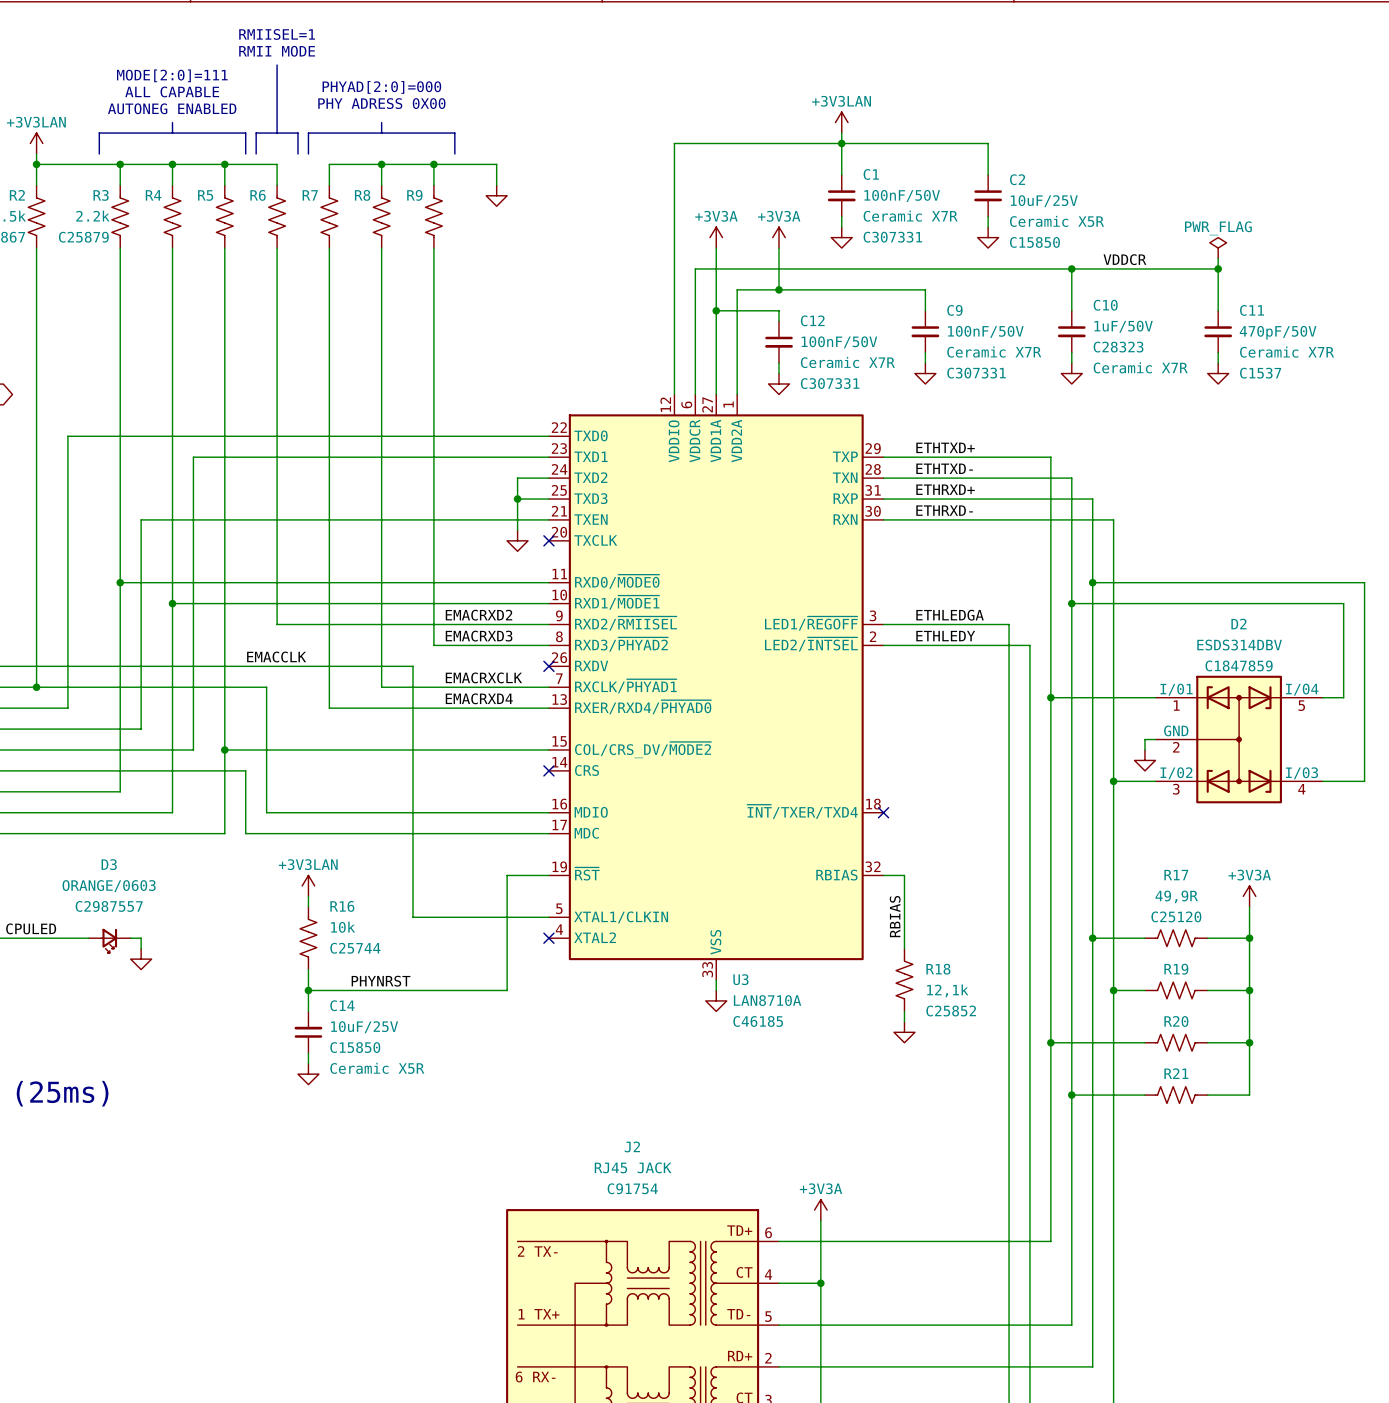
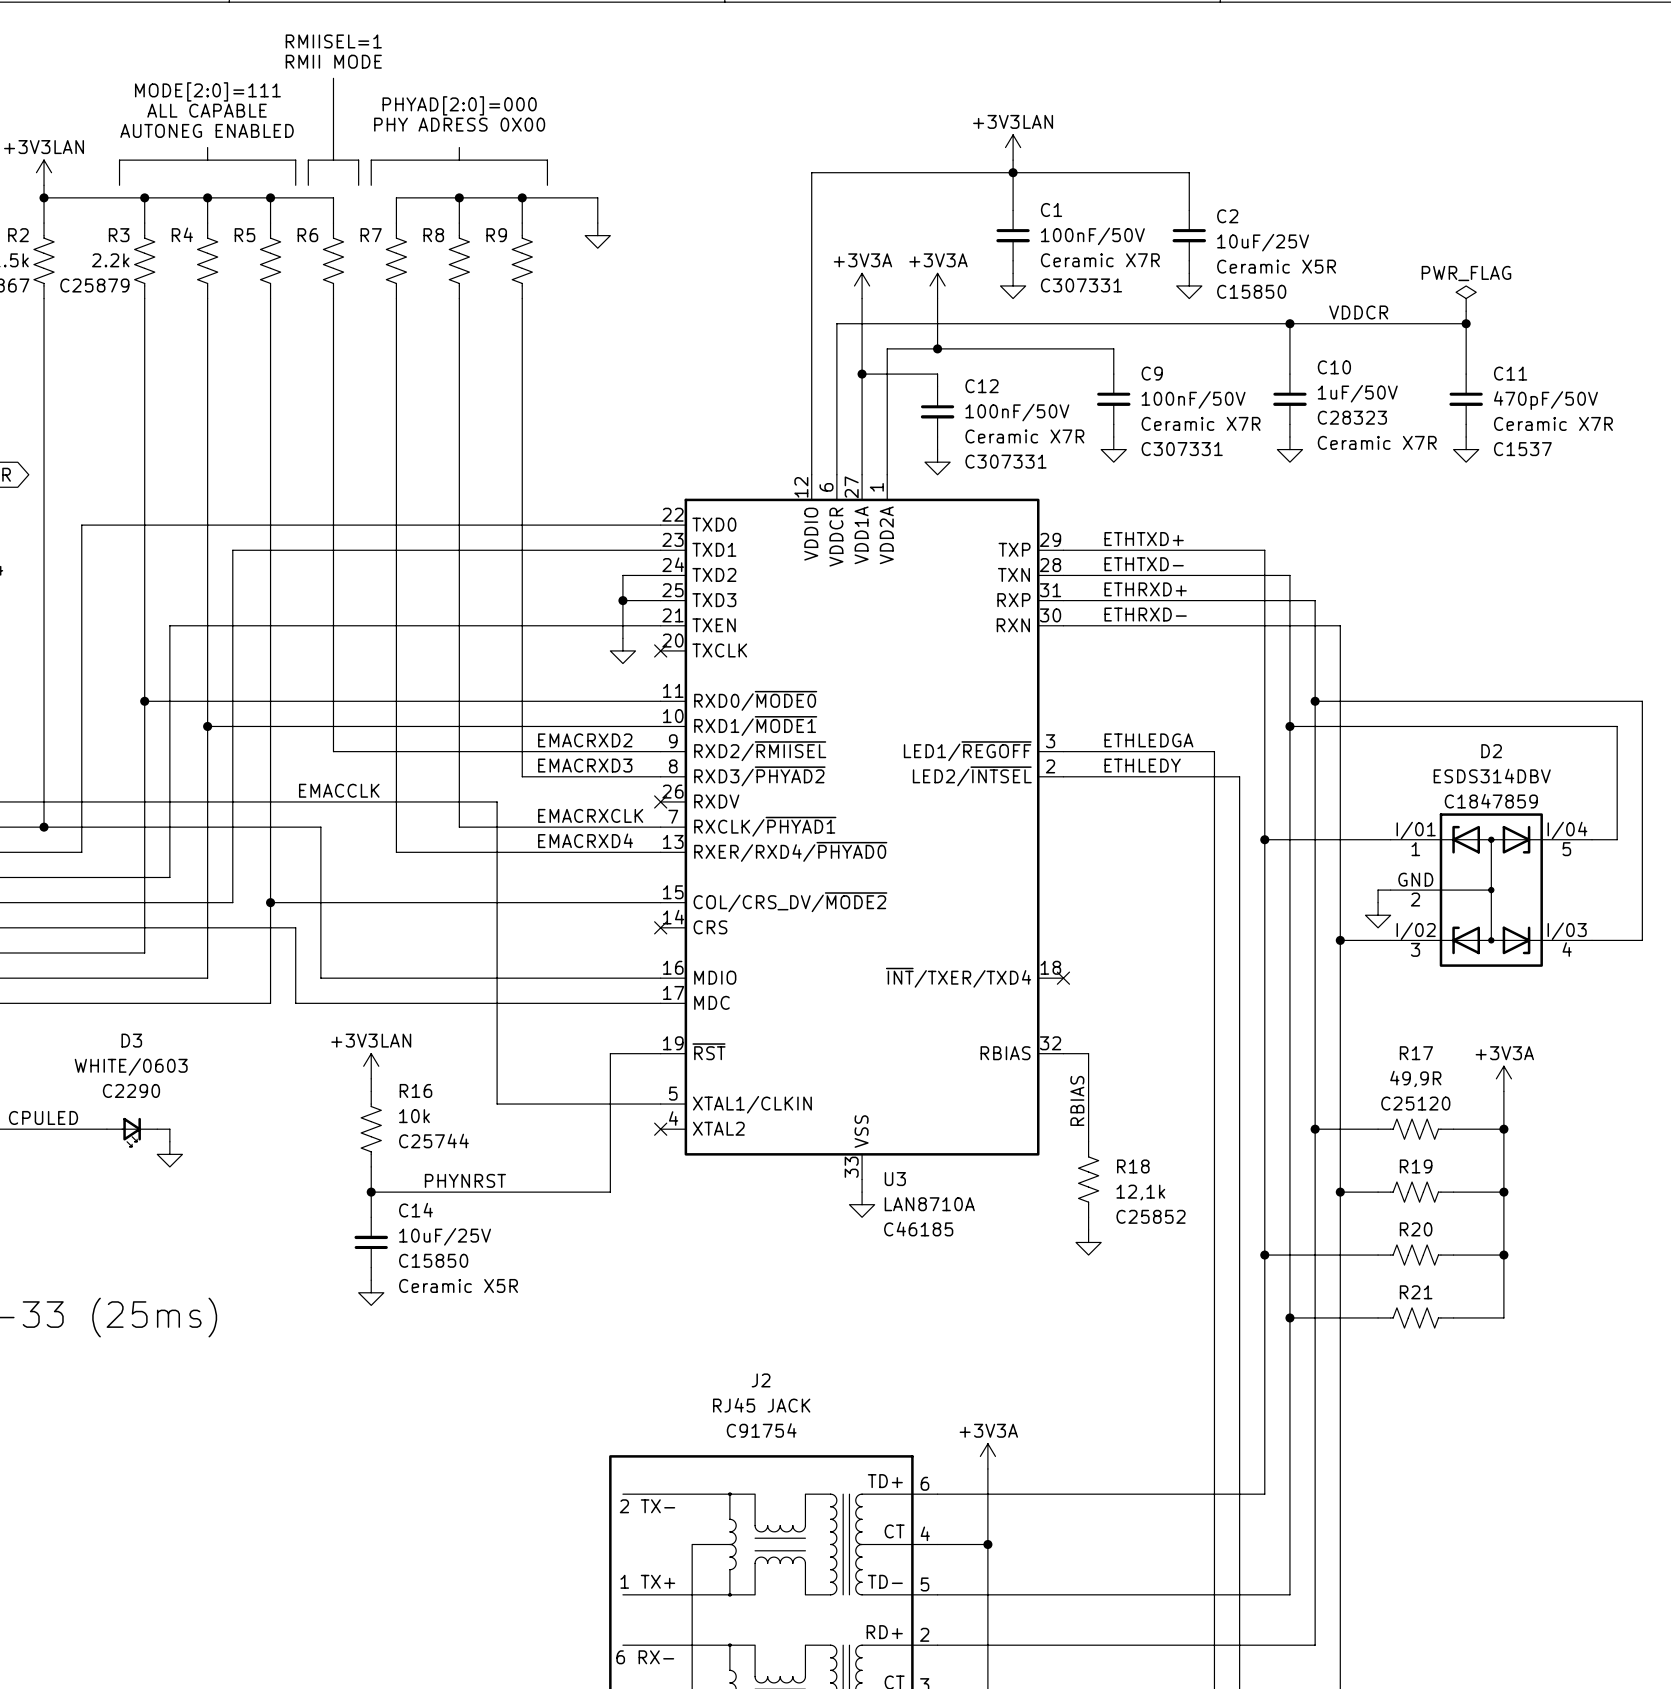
D3 value: ORANGE/0603 (109, 886) -> WHITE/0603 (131, 1066)
D3 text: C2987557 (109, 906) -> C2290 (131, 1090)

